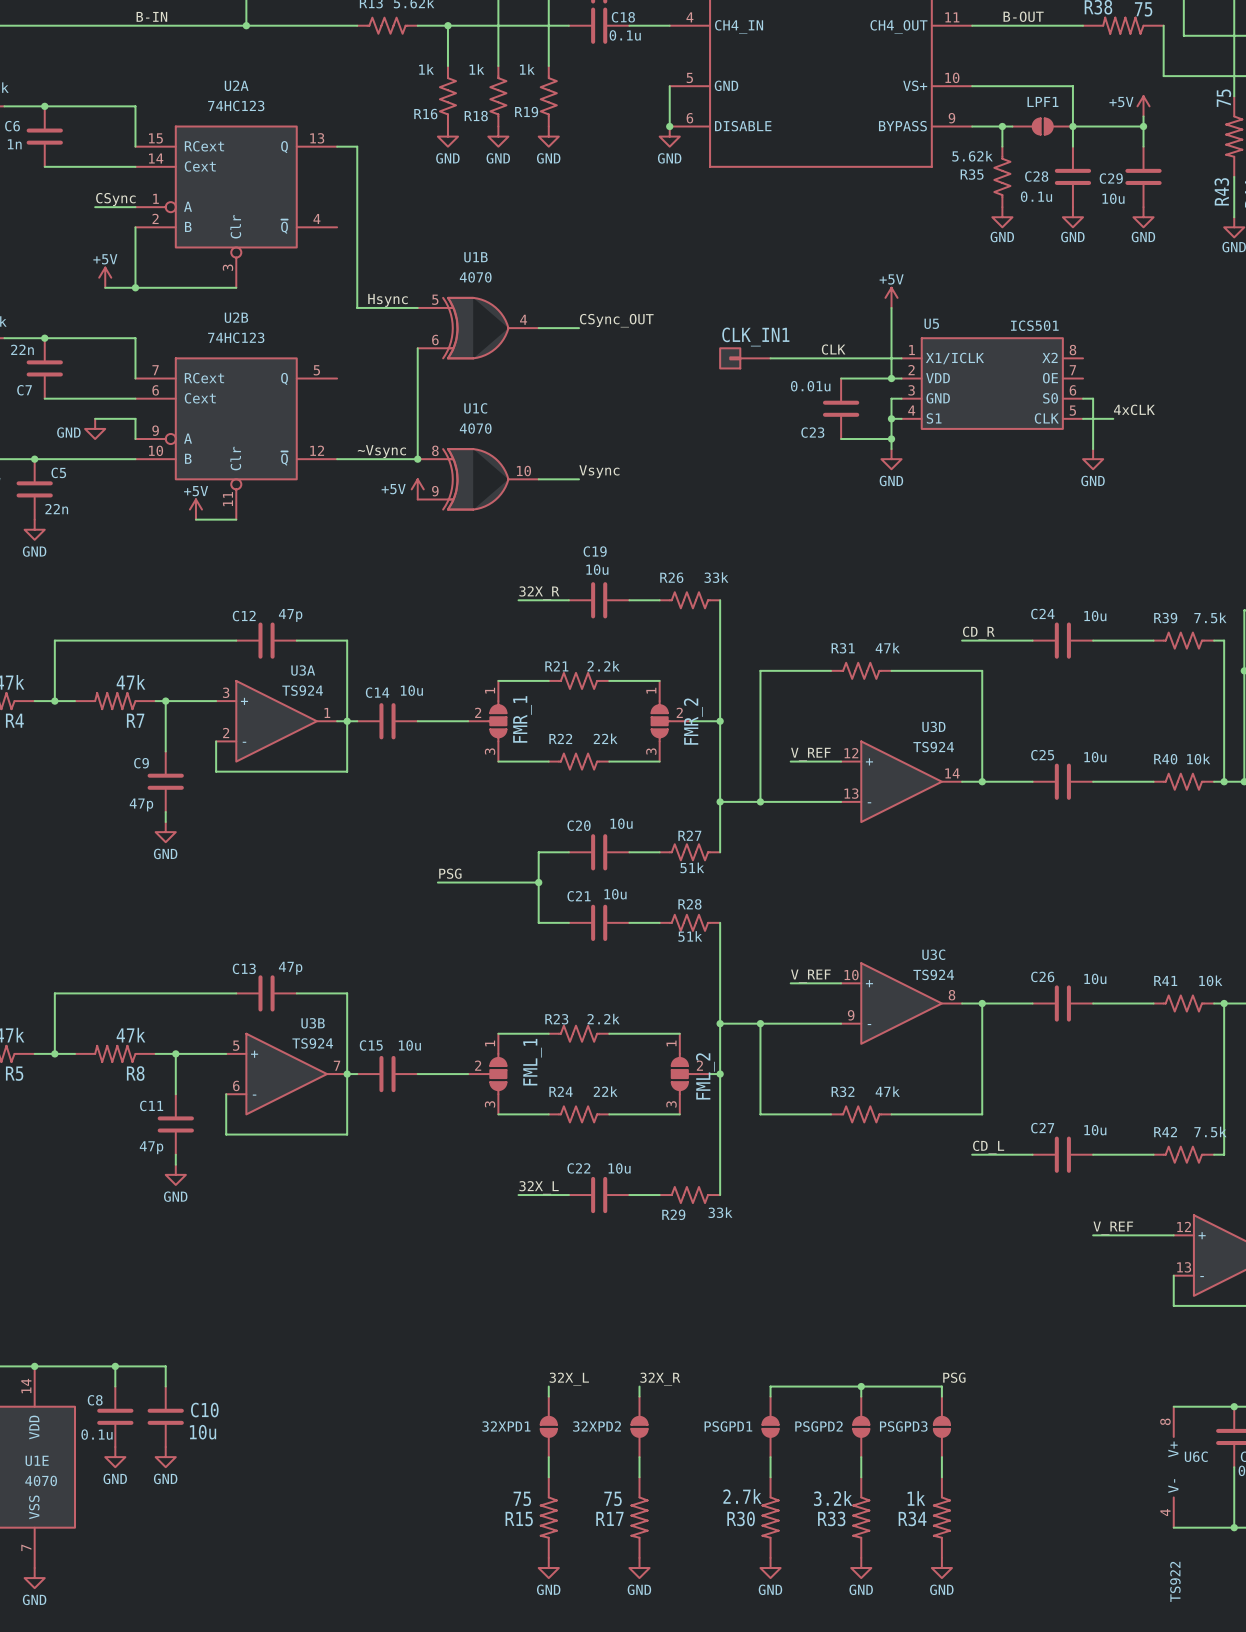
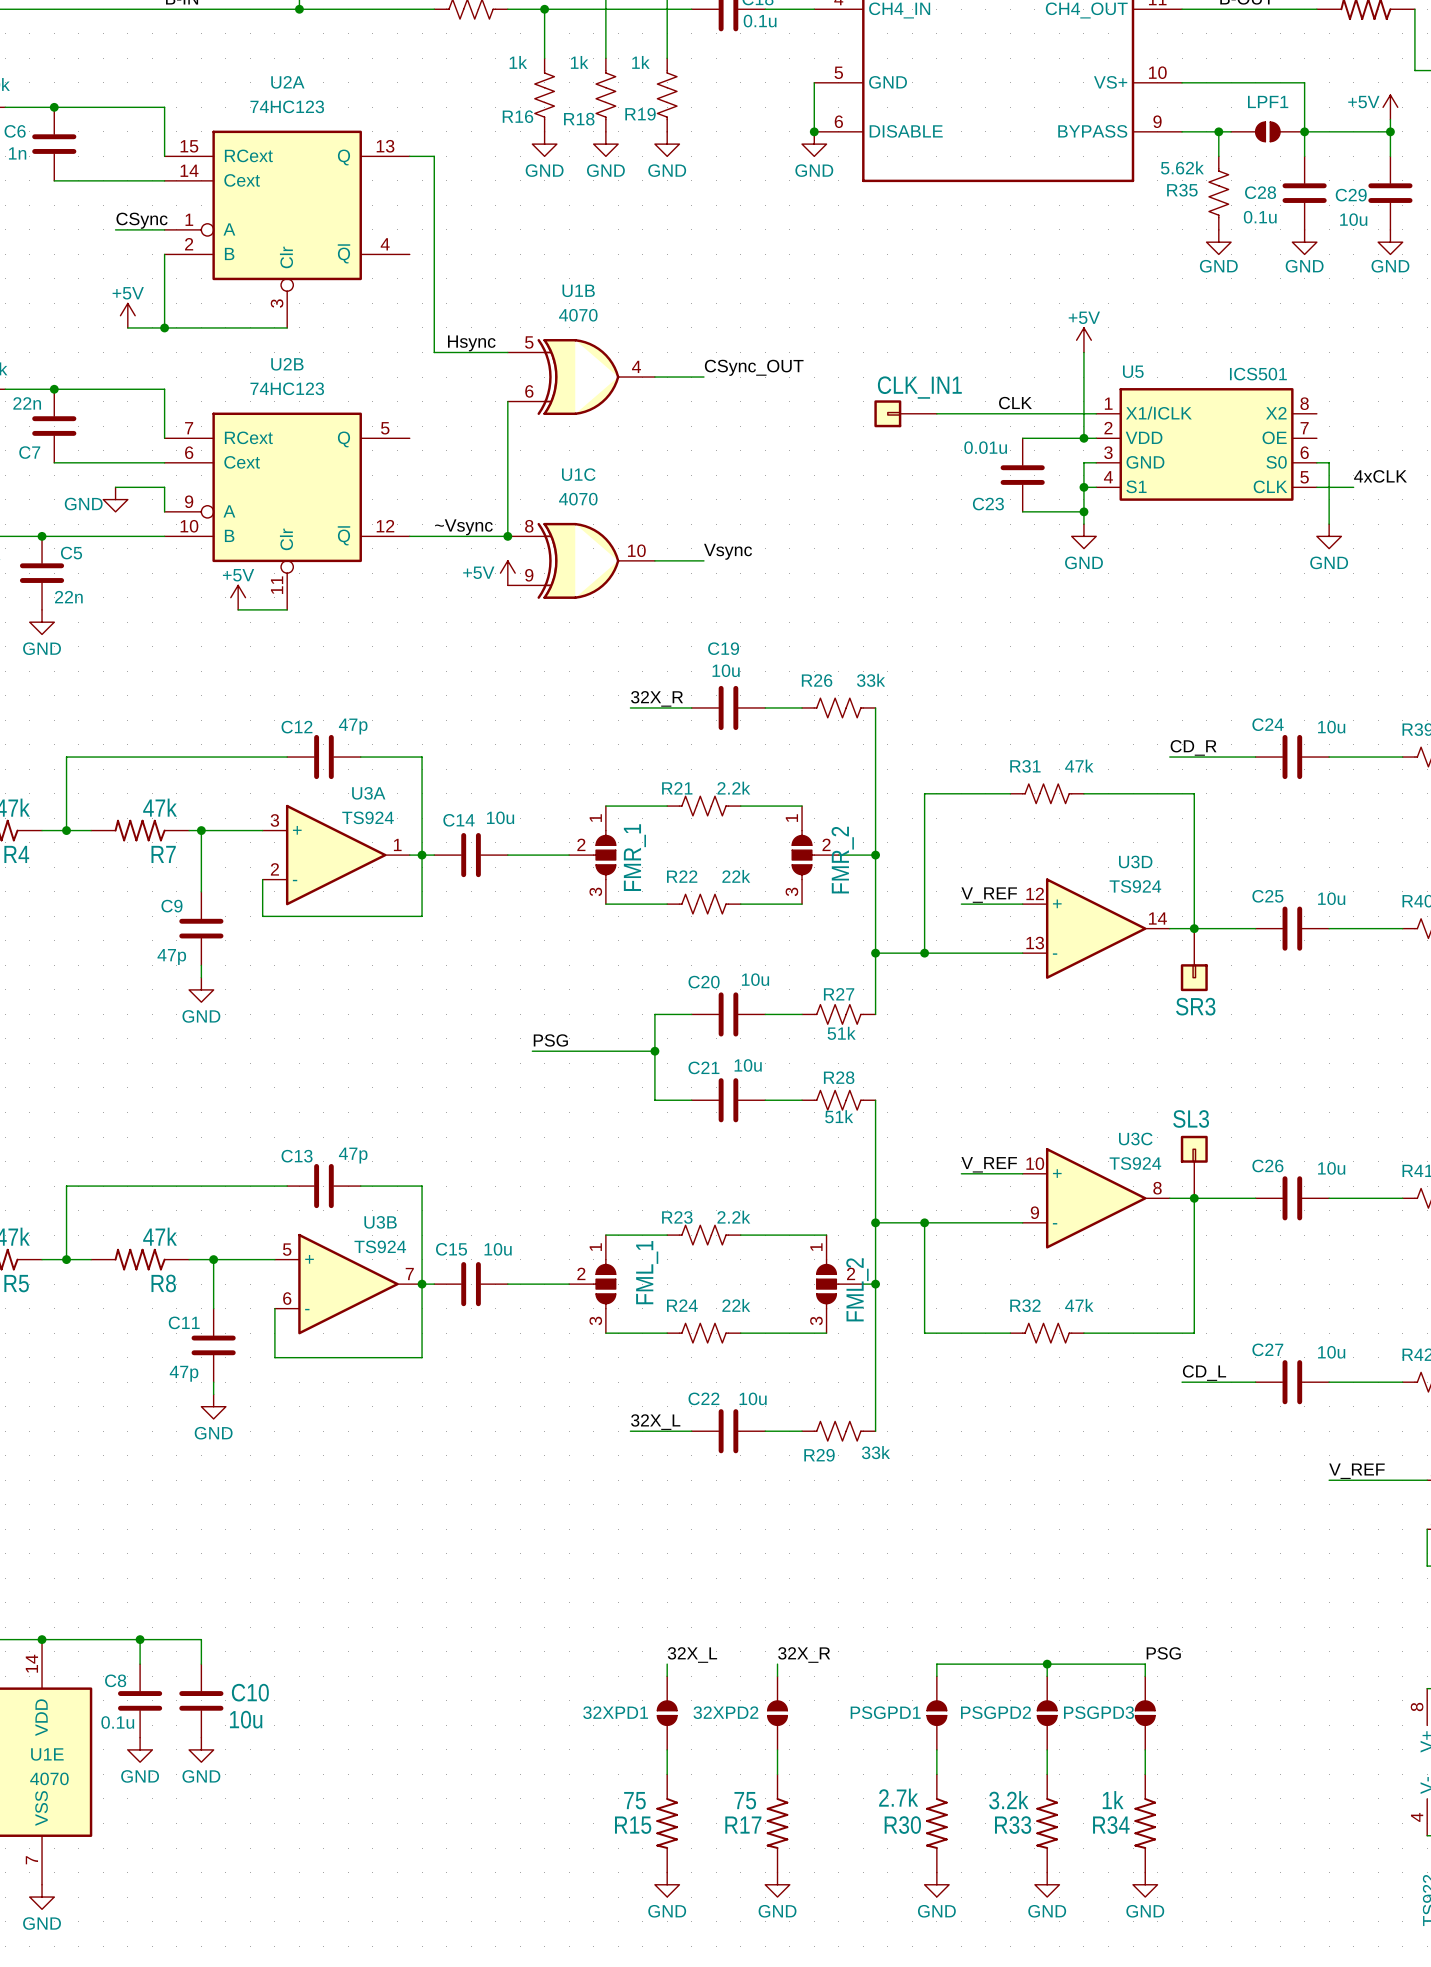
SR3: none -> (1194, 959)
SL3: none -> (1194, 1167)

